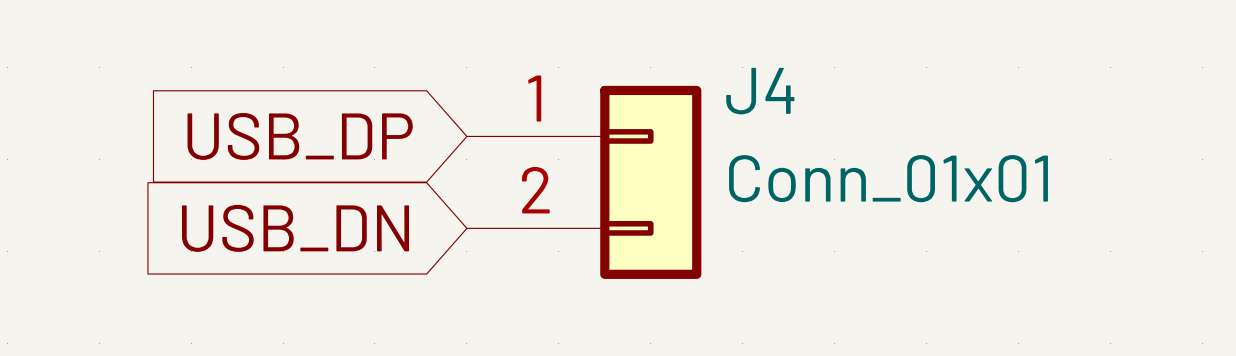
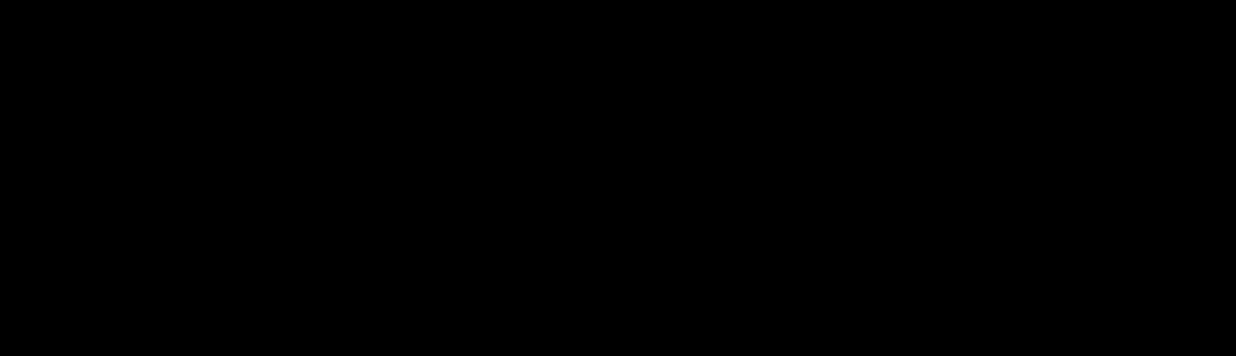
global label: USB_DP (300, 136) -> none
J4: Conn_01x01 (584, 182) -> none
global label: USB_DN (295, 228) -> none

